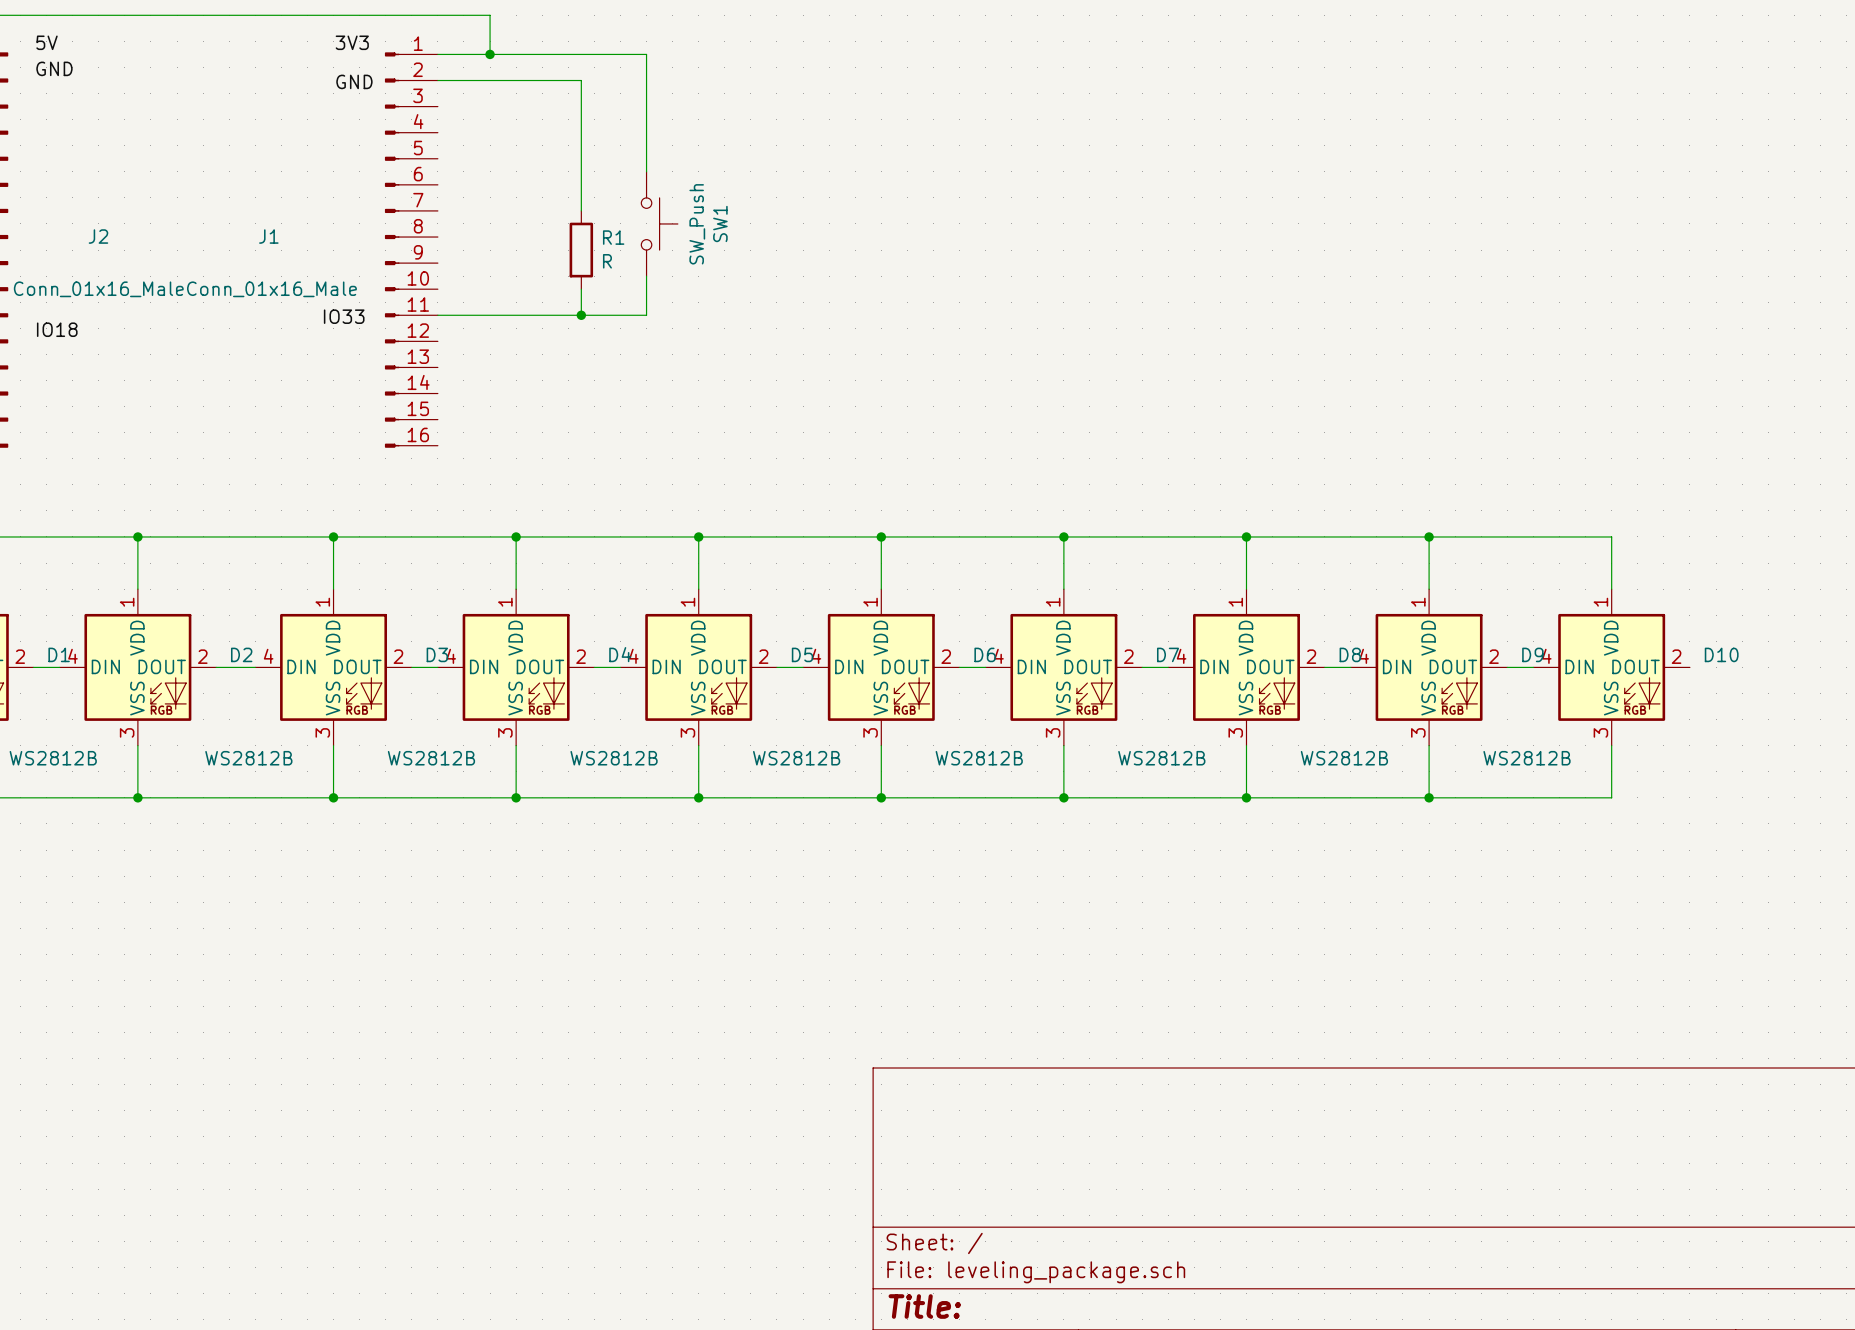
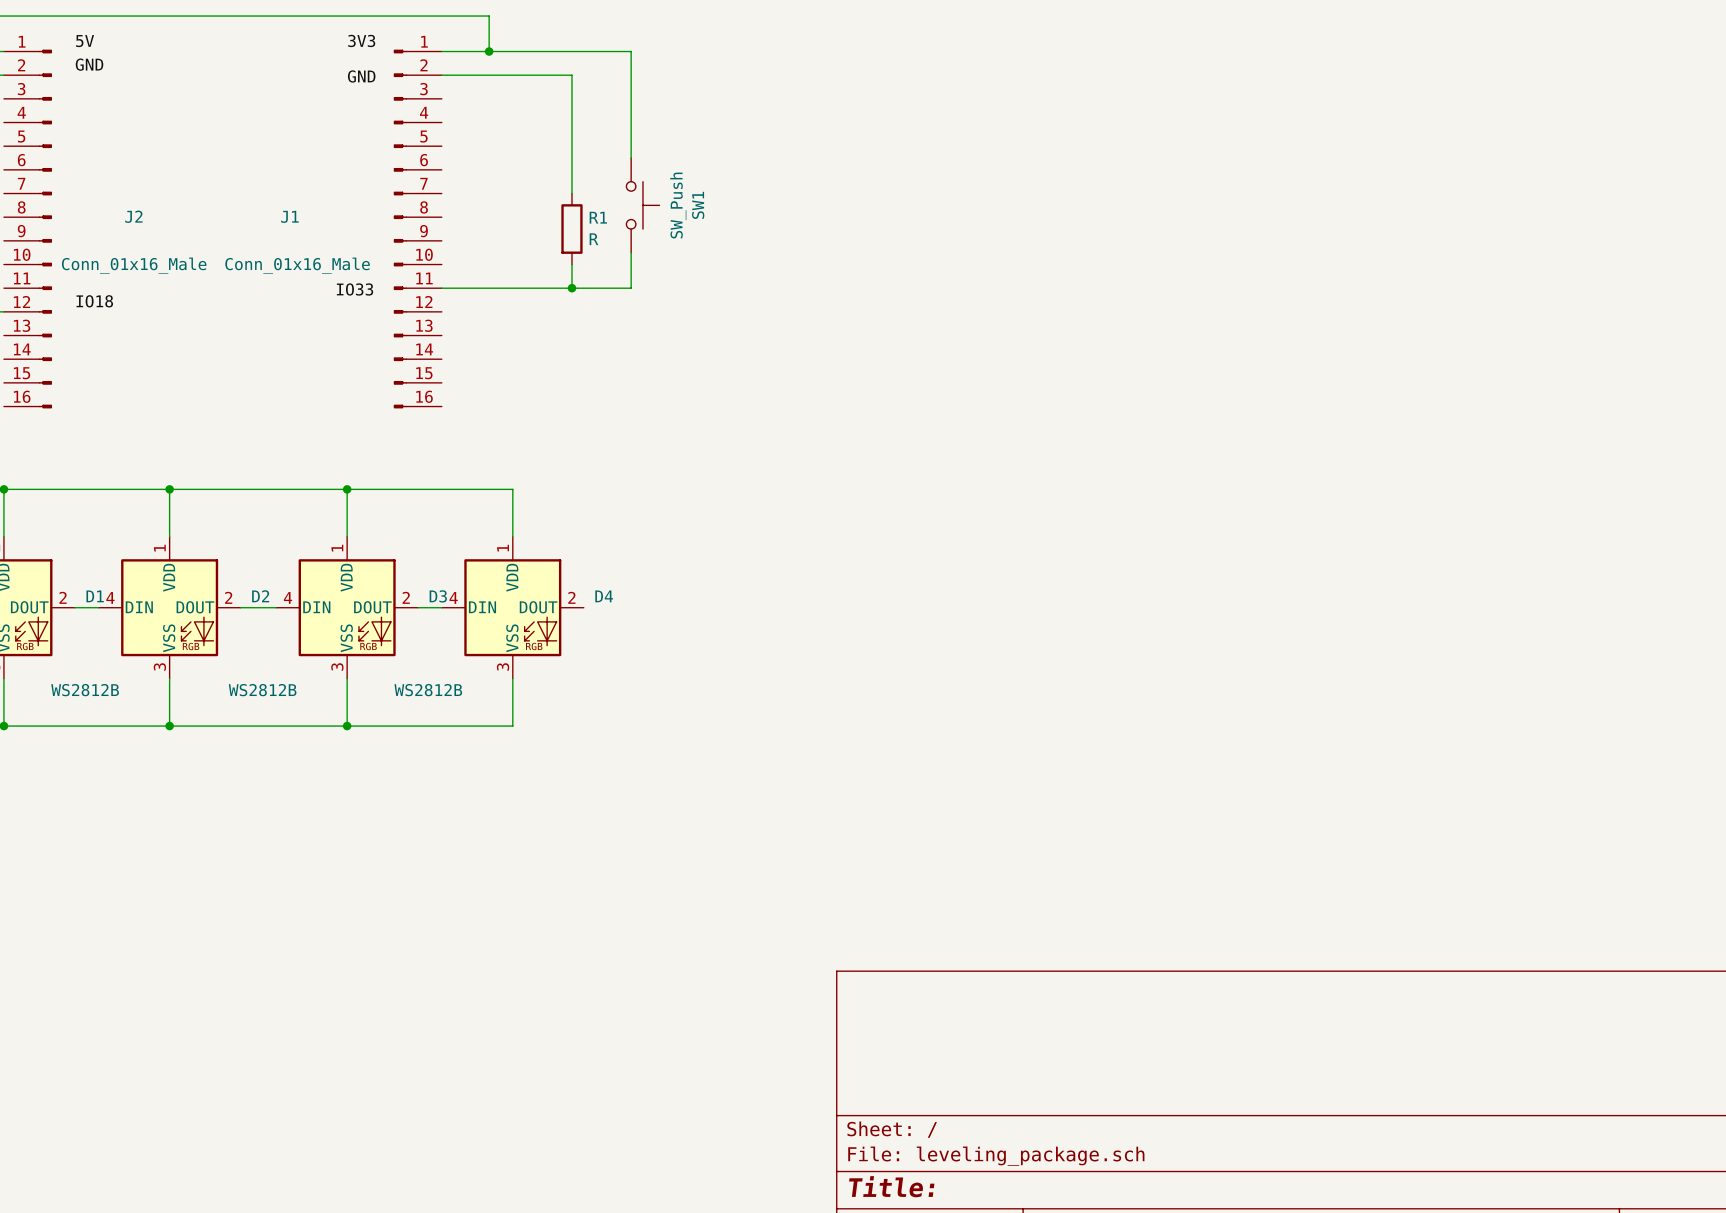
wire: (516, 536) (1611, 536) (1611, 589) -> none
junction: (516, 536) -> none
wire: (698, 536) (698, 589) -> none
junction: (698, 536) -> none
wire: (881, 536) (881, 589) -> none
junction: (881, 536) -> none
wire: (1063, 536) (1063, 589) -> none
junction: (1063, 536) -> none
wire: (1246, 536) (1246, 589) -> none
junction: (1246, 536) -> none
wire: (1429, 536) (1429, 589) -> none
junction: (1429, 536) -> none
wire: (594, 667) (620, 667) -> none
D5: WS2812B (698, 667) -> none
wire: (776, 667) (803, 667) -> none
D6: WS2812B (881, 667) -> none
wire: (959, 667) (985, 667) -> none
D7: WS2812B (1063, 667) -> none
wire: (1142, 667) (1168, 667) -> none
D8: WS2812B (1246, 667) -> none
wire: (1324, 667) (1350, 667) -> none
D9: WS2812B (1429, 667) -> none
wire: (1507, 667) (1533, 667) -> none
D10: WS2812B (1611, 667) -> none
wire: (698, 745) (698, 797) -> none
wire: (881, 745) (881, 797) -> none
wire: (1063, 745) (1063, 797) -> none
wire: (1246, 745) (1246, 797) -> none
wire: (1429, 745) (1429, 797) -> none
wire: (1611, 745) (1611, 797) (516, 797) -> none
junction: (516, 797) -> none
junction: (698, 797) -> none
junction: (881, 797) -> none
junction: (1063, 797) -> none
junction: (1246, 797) -> none
junction: (1429, 797) -> none

